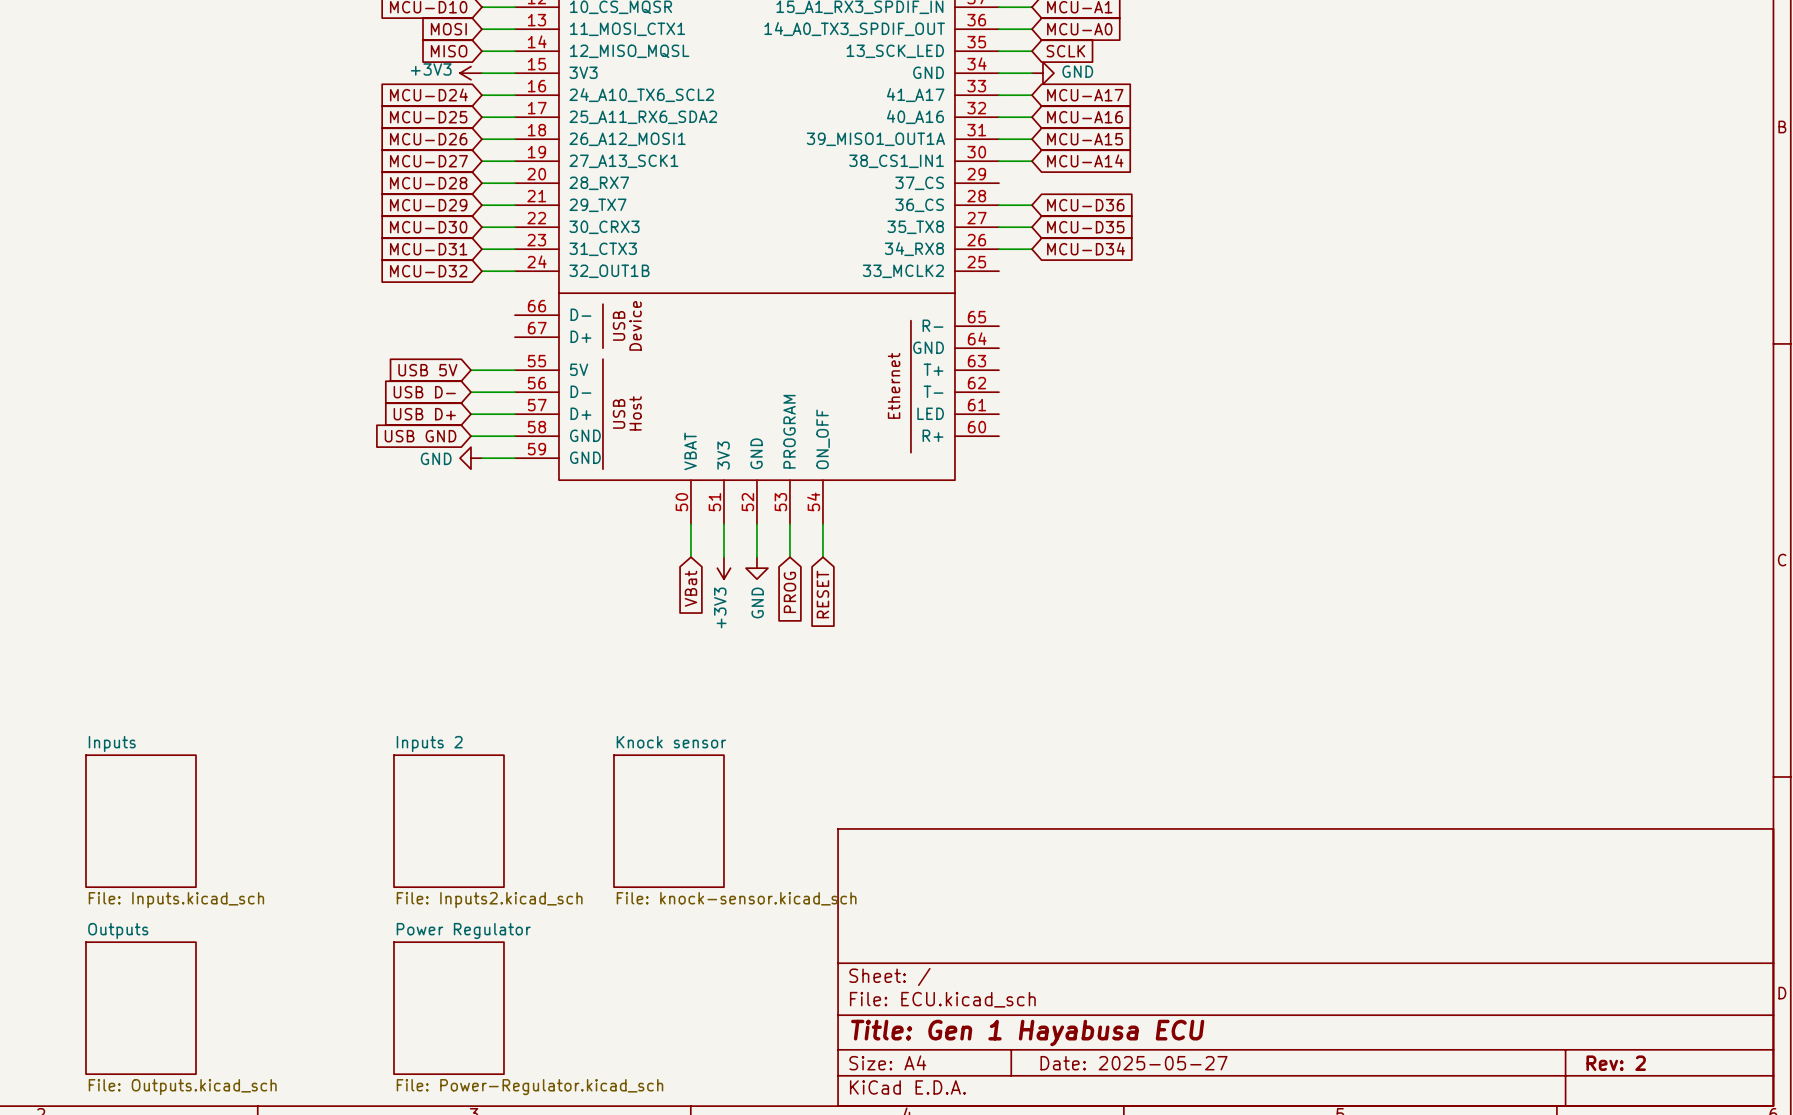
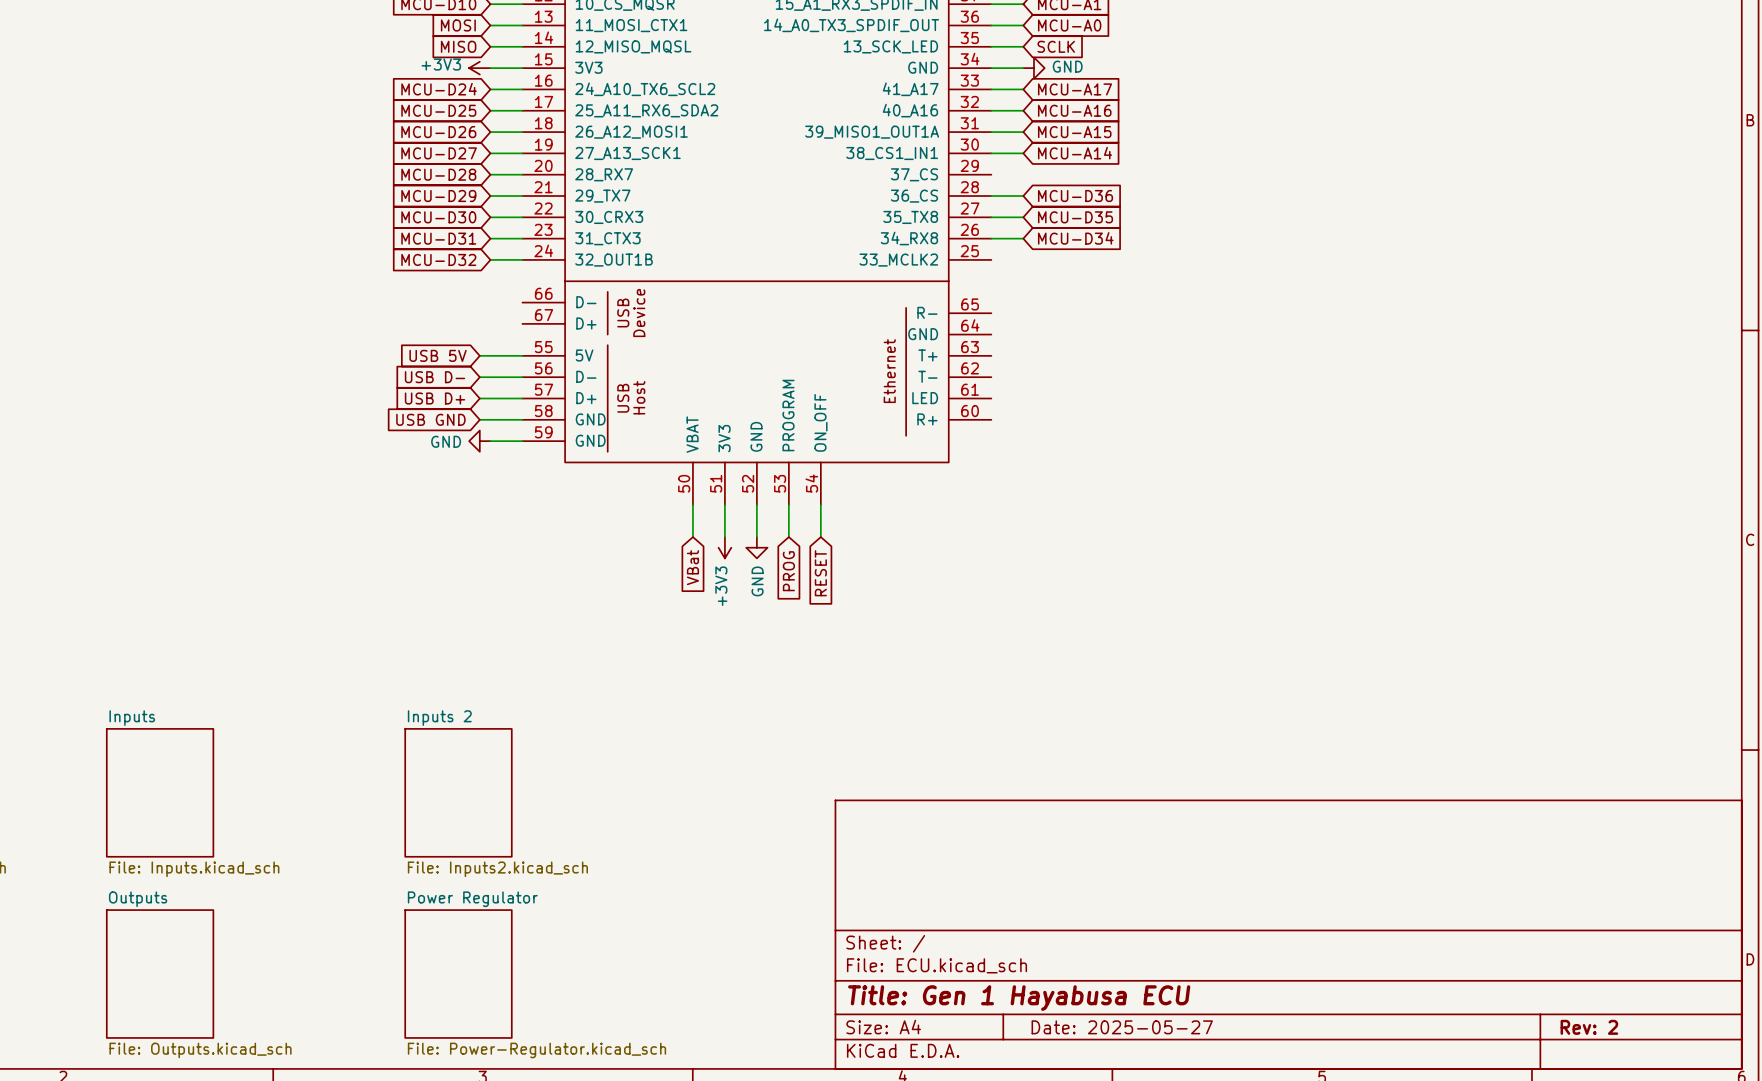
sheet Knock sensor: File: knock-sensor.kicad_sch (668, 821) -> none

